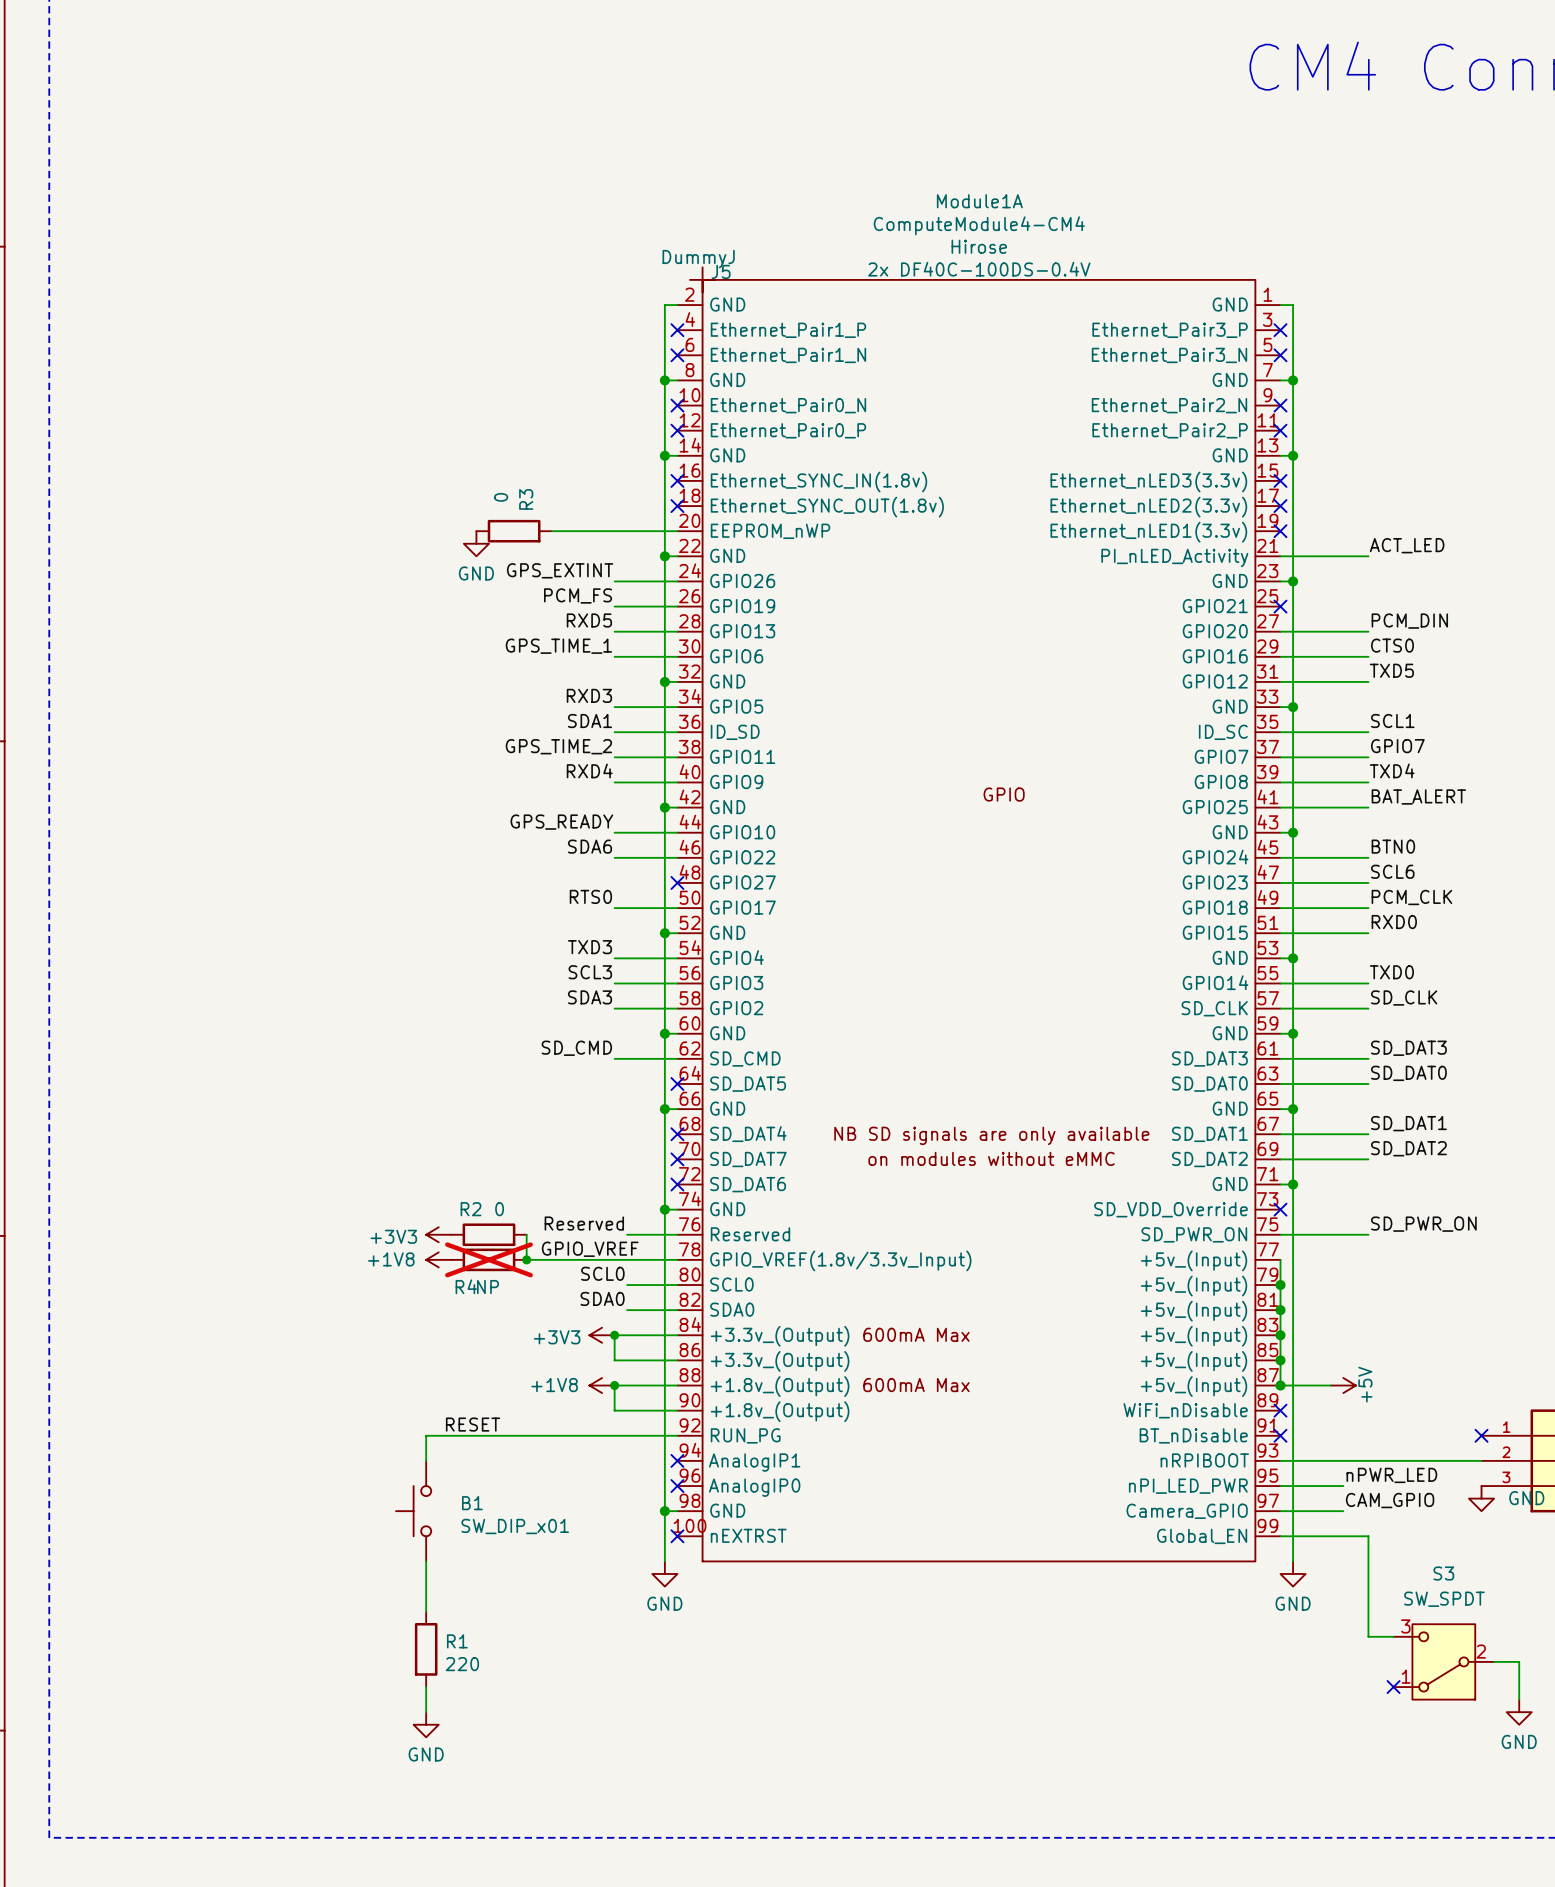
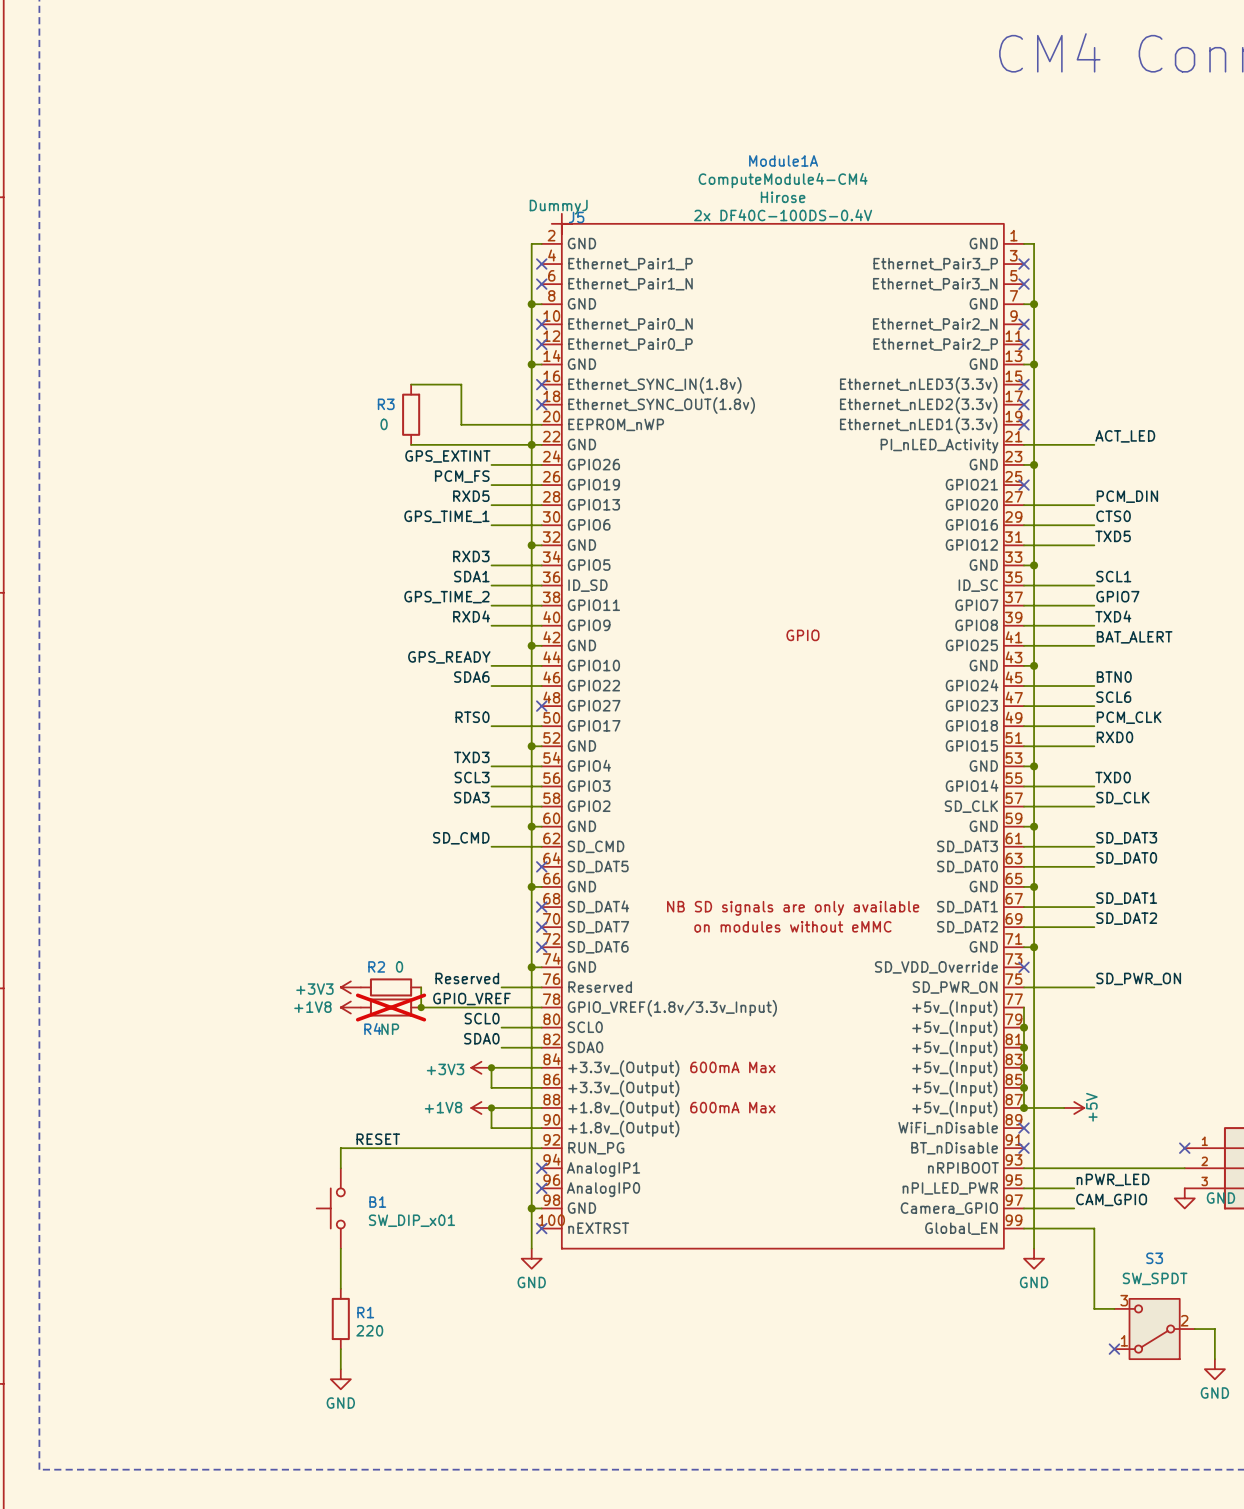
R3 value position: 0 (501, 497) -> 0 (384, 424)
R3 name position: R3 (526, 499) -> R3 (386, 404)
R3 rotation: 0° (514, 531) -> 90° clockwise (411, 414)
wire: (551, 531) (576, 531) -> (411, 384) (461, 384) (461, 424)
power symbol: GND (476, 543) -> none
wire: none -> (411, 444) (531, 444)

